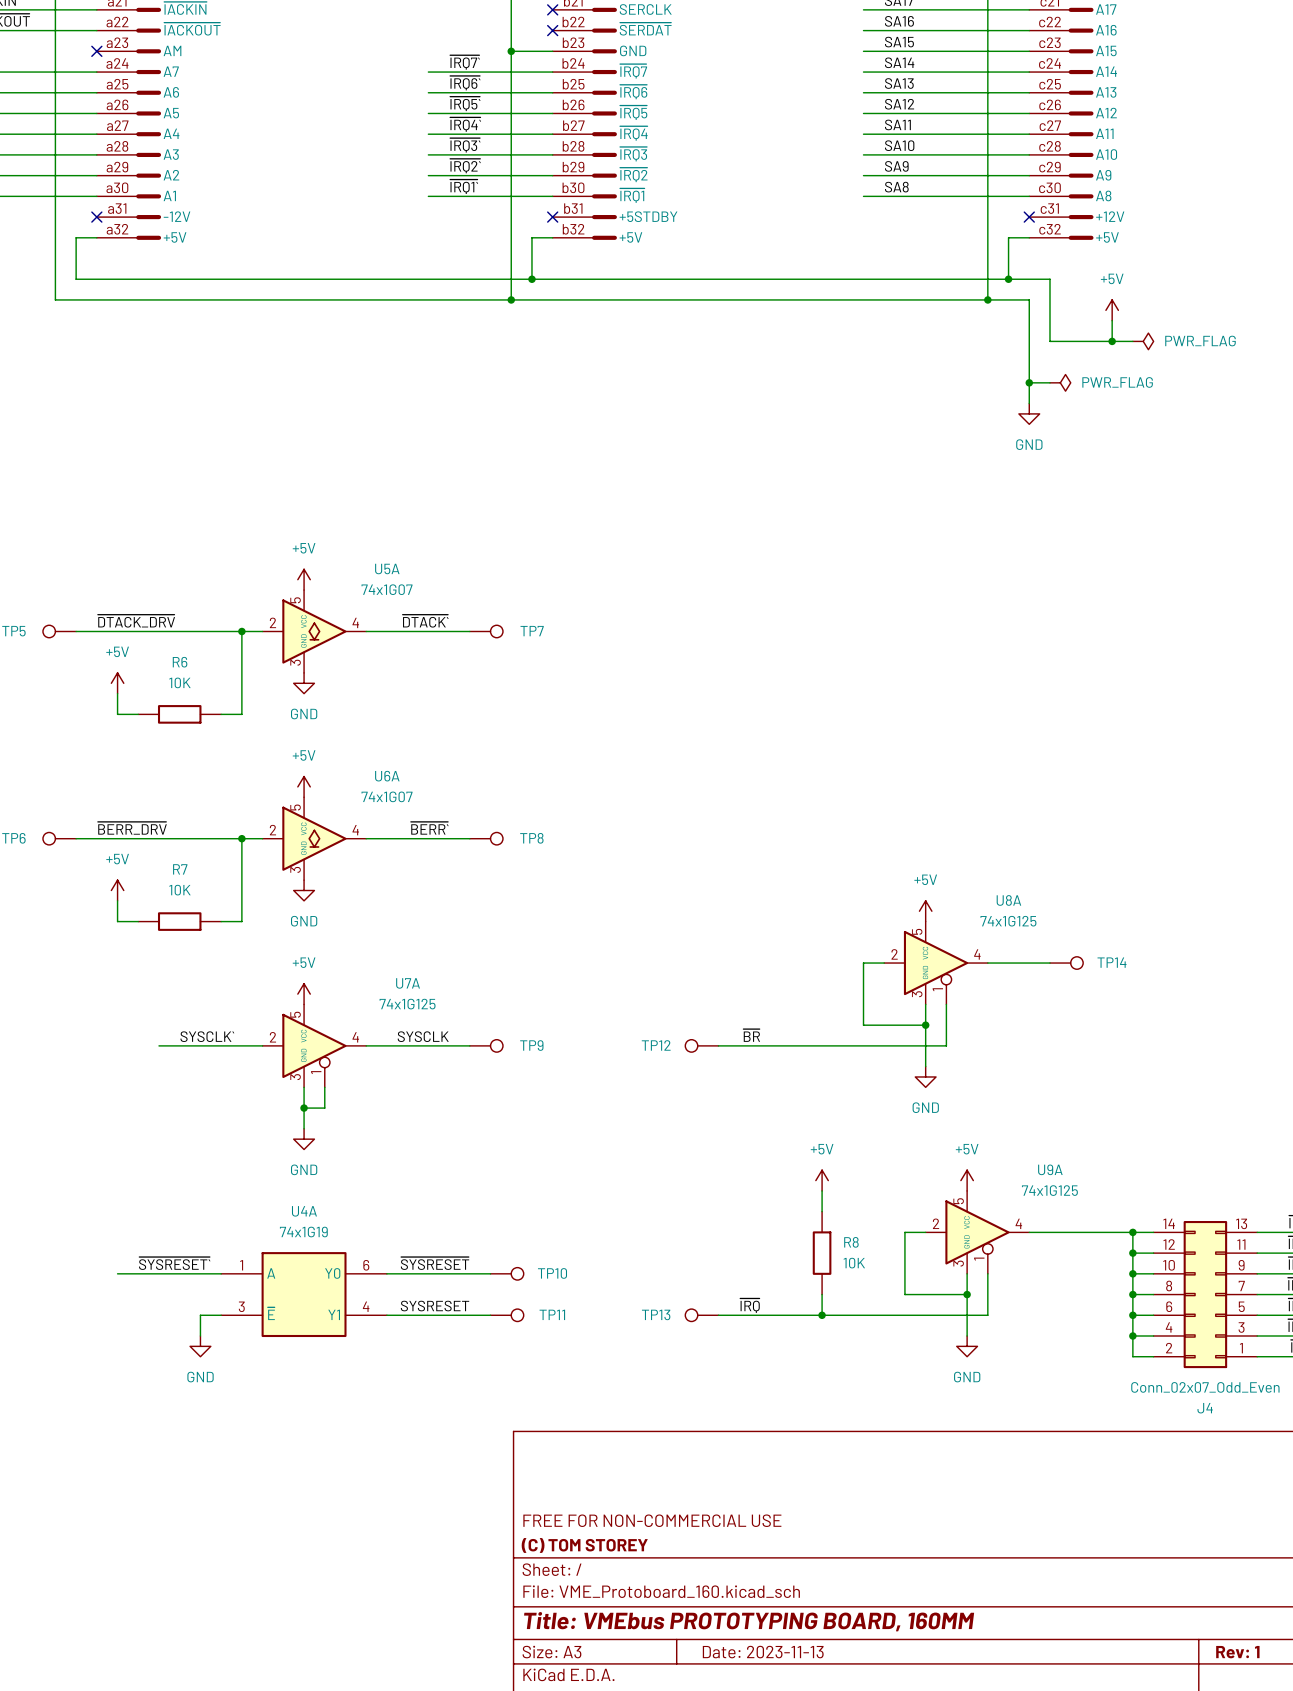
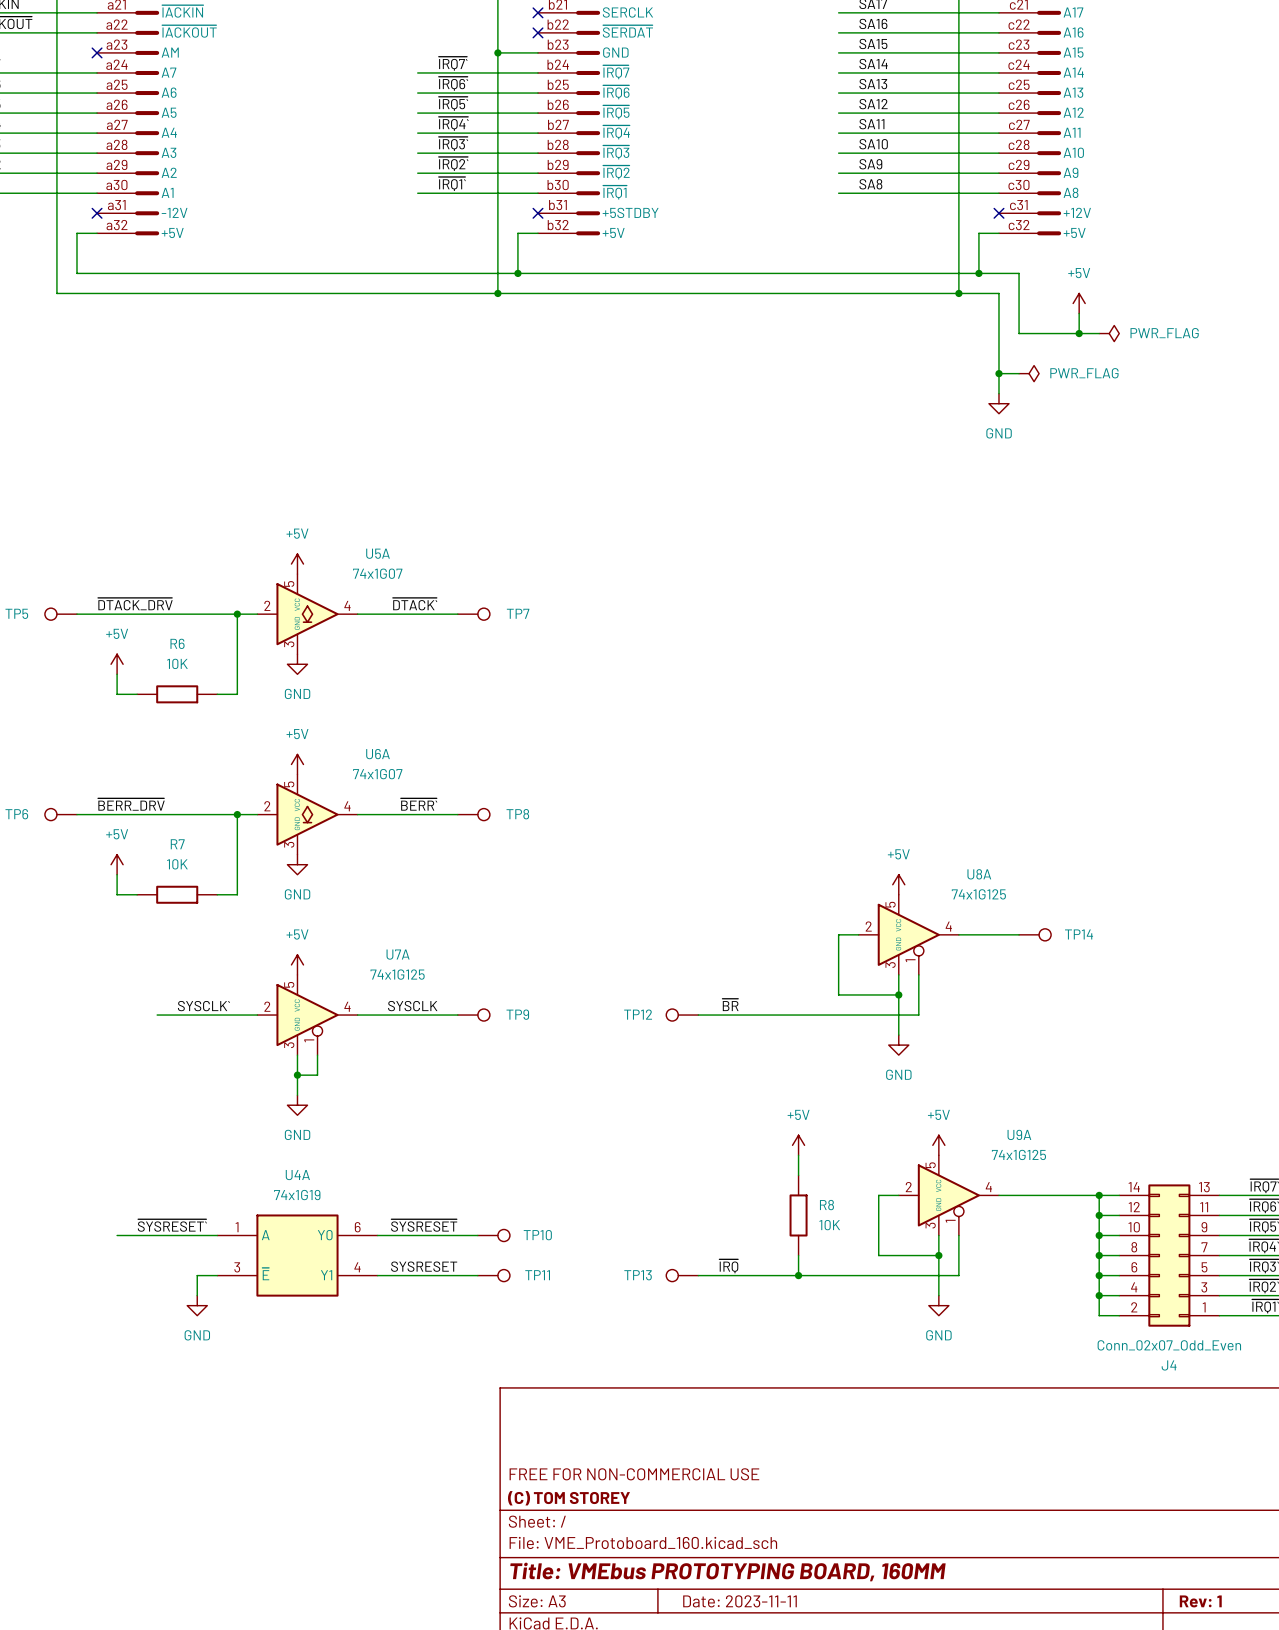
title block: Date: 2023-11-13 (763, 1652) -> Date: 2023-11-11 (740, 1601)

